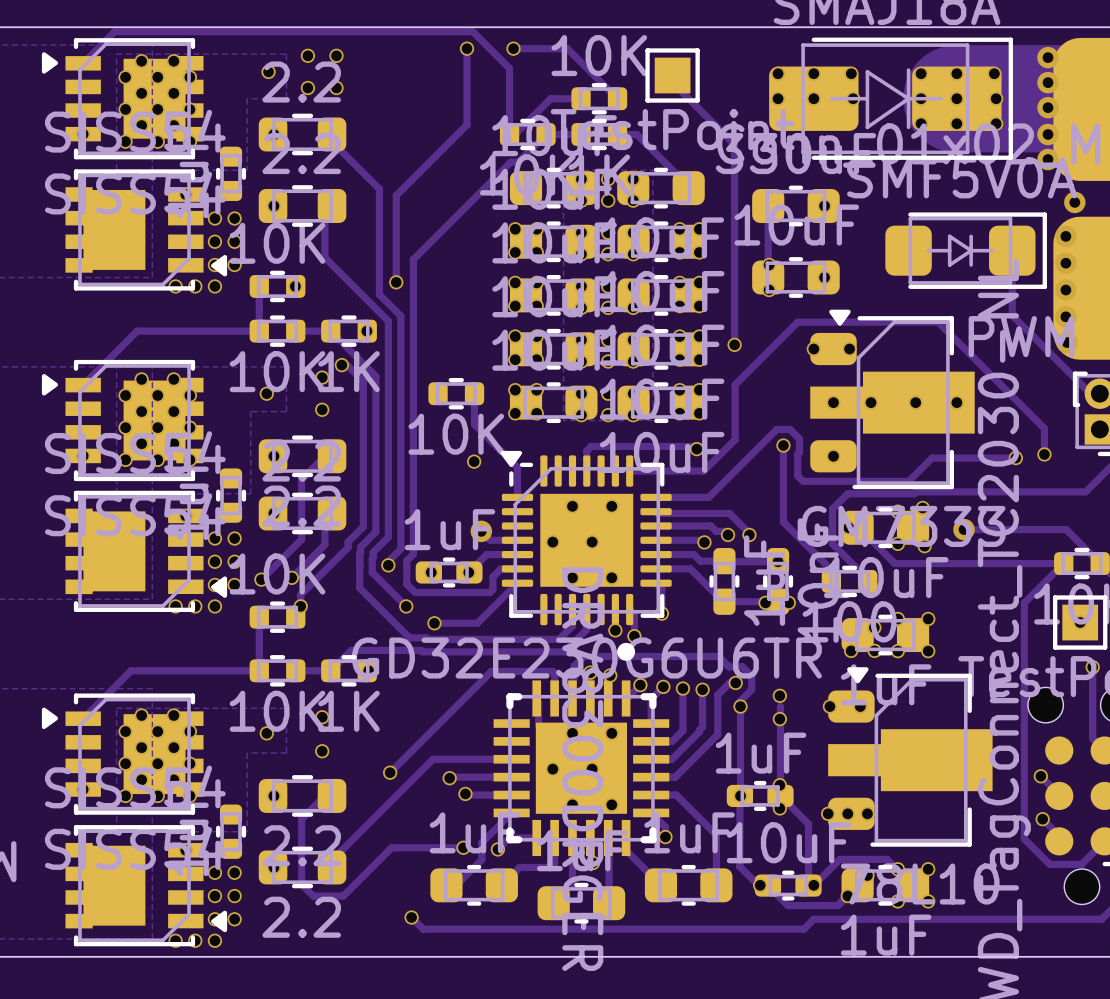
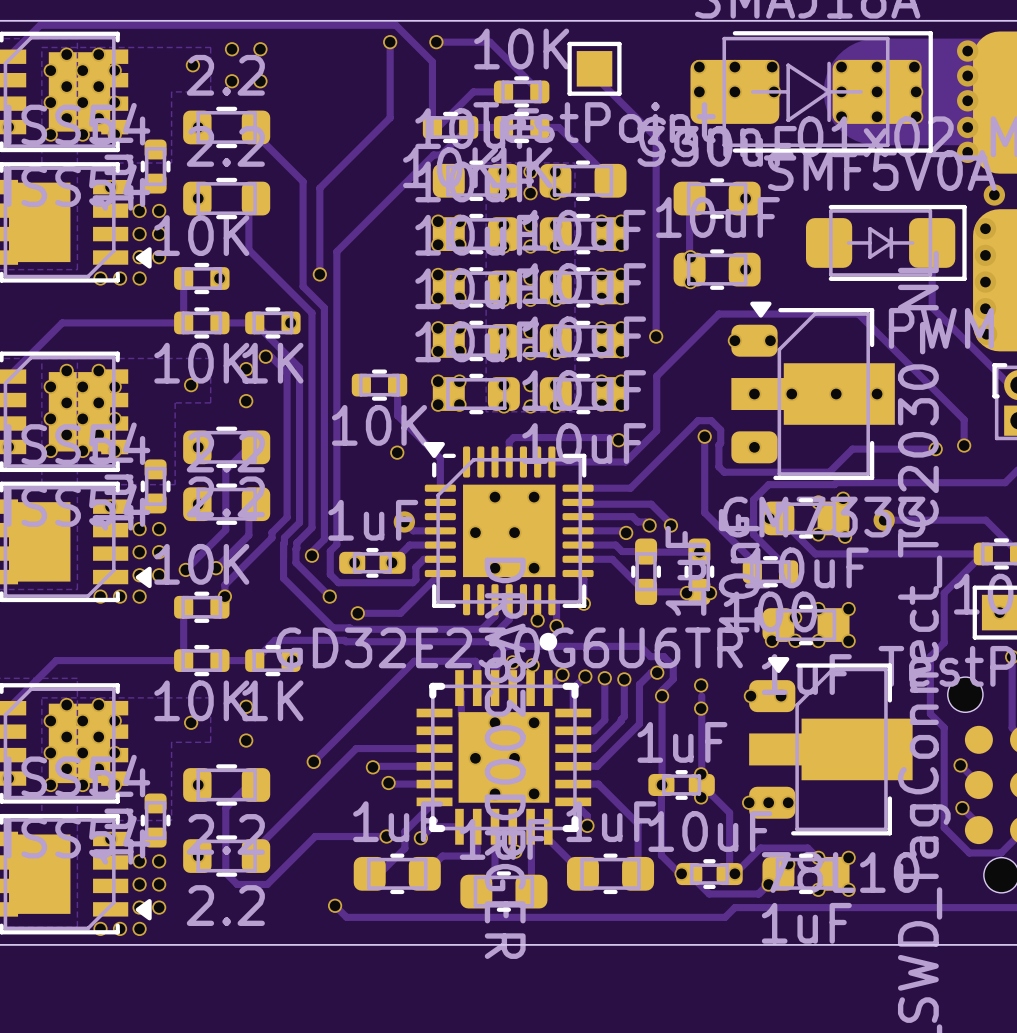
track: (1024, 652) (1024, 738) -> (944, 642) (930, 656) (930, 713) (944, 727)

